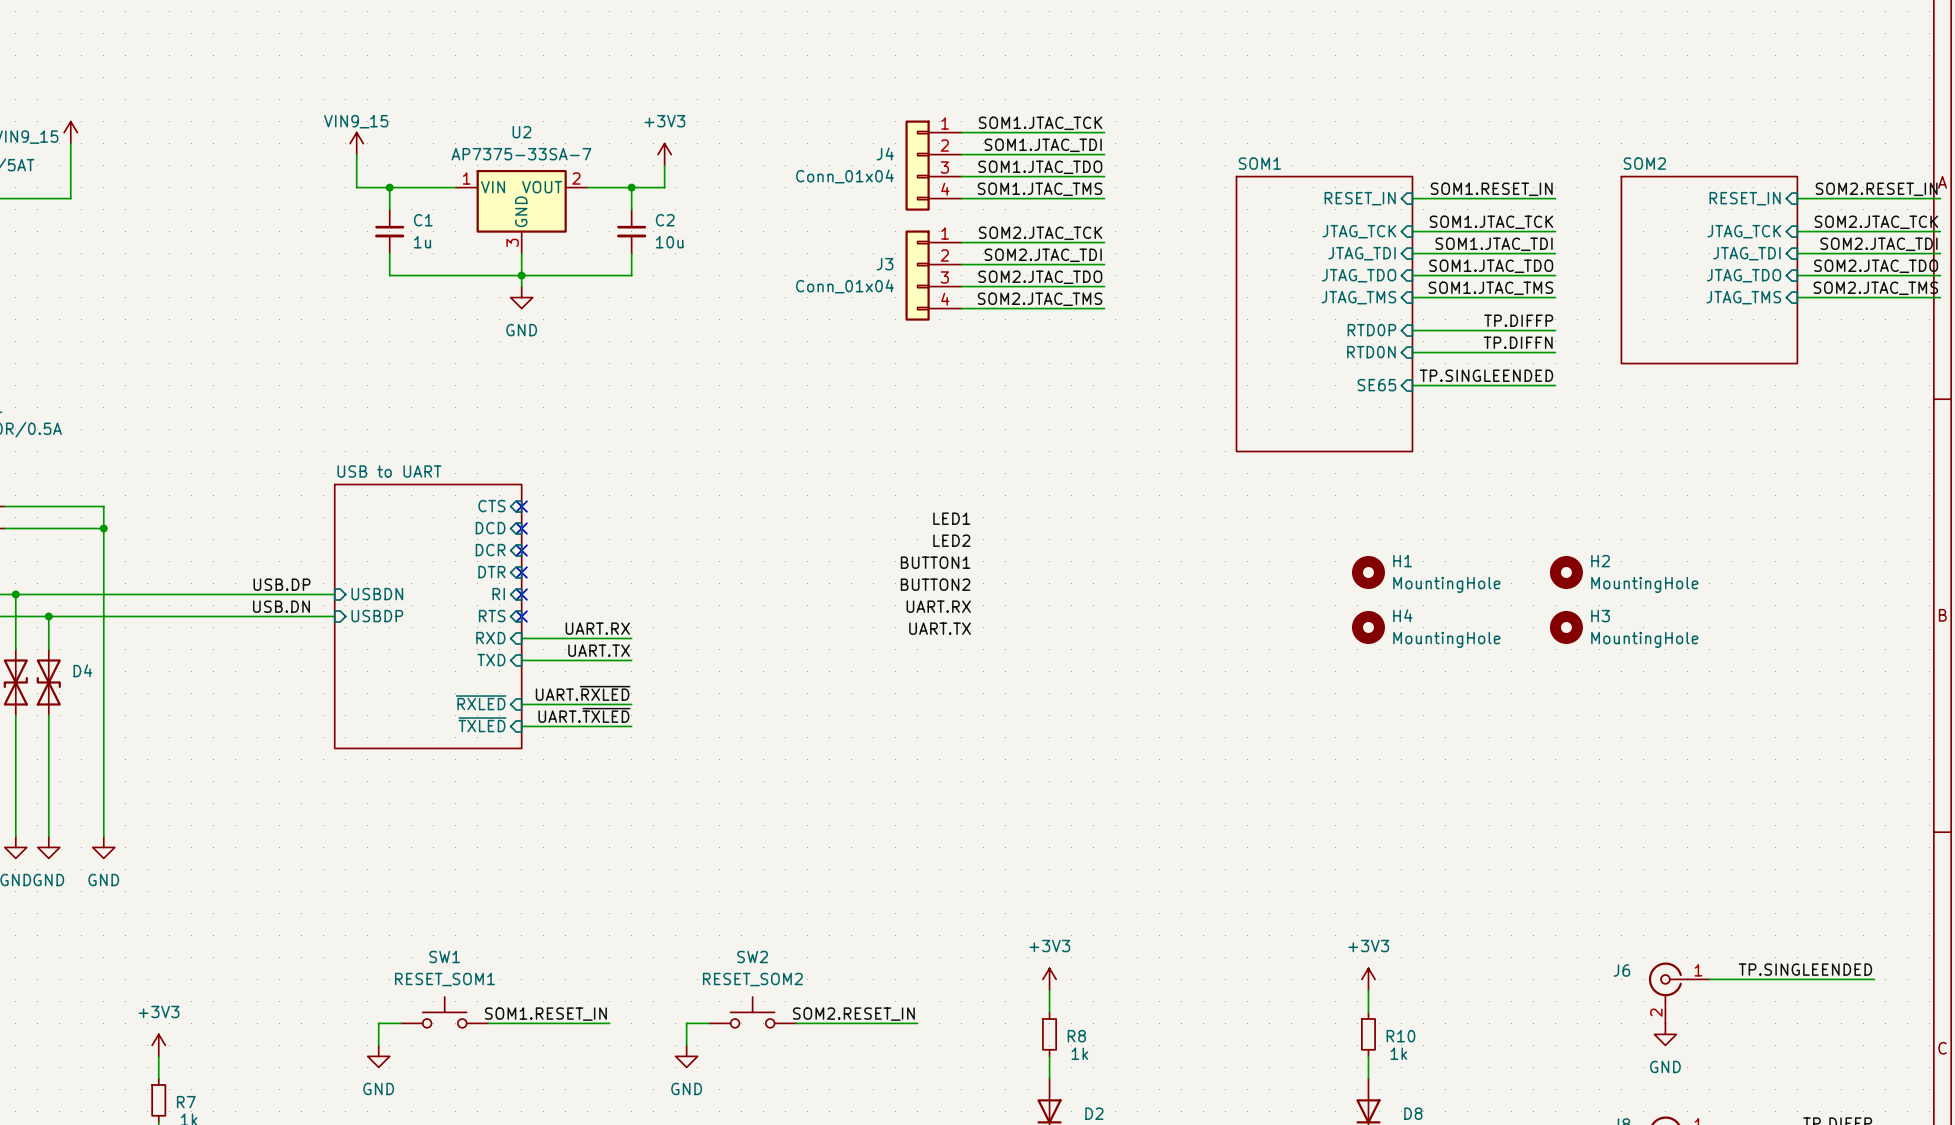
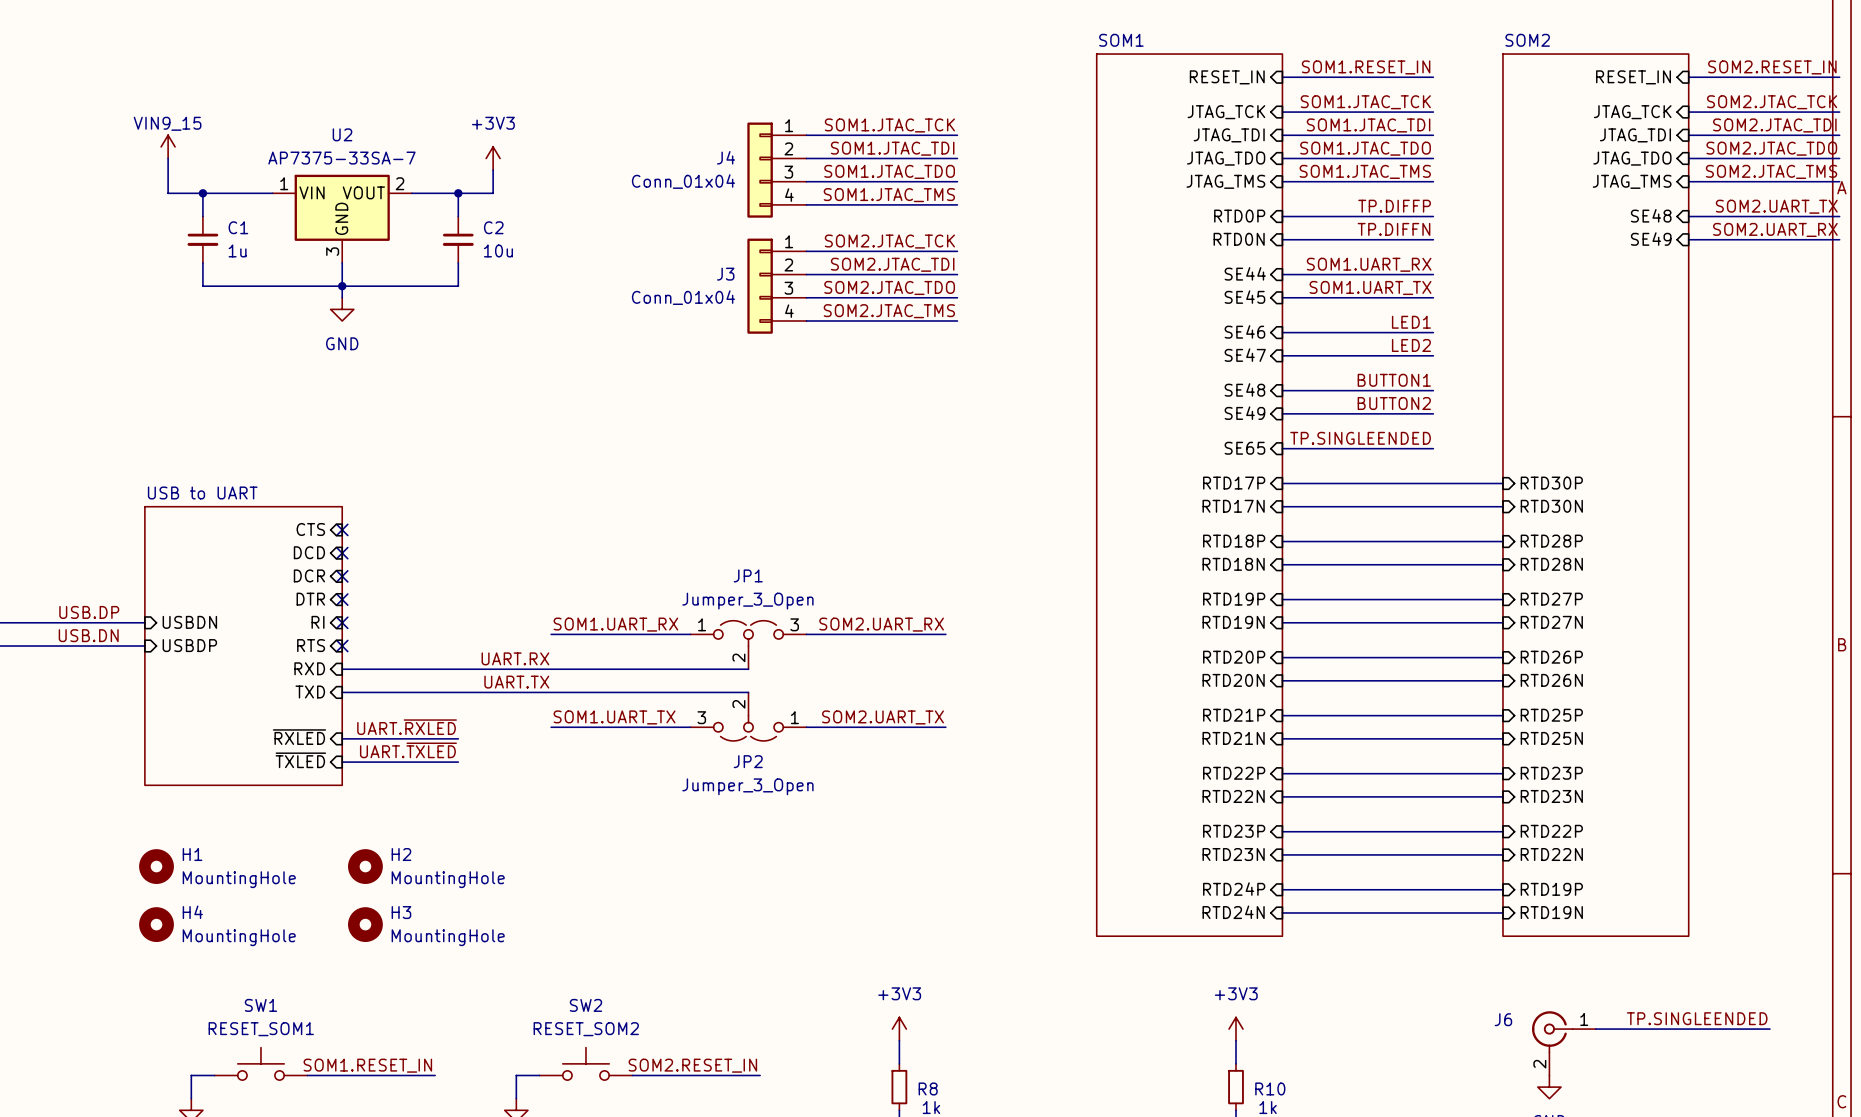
label: none -> SOM1.JTAC_TCK (1365, 102)
label: none -> SOM2.JTAC_TCK (1772, 102)
sheet pin: none -> JTAG_TCK (1226, 112)
wire: none -> (1282, 112) (1433, 112)
sheet pin: none -> JTAG_TCK (1632, 112)
wire: none -> (1688, 112) (1839, 112)
sheet SOM1 name position: SOM1 (1259, 163) -> SOM1 (1121, 40)
sheet SOM2 name position: SOM2 (1644, 163) -> SOM2 (1527, 40)
sheet SOM1 shape: [1235, 175, 1414, 453] -> [1096, 53, 1284, 937]
sheet SOM2 shape: [1620, 175, 1799, 365] -> [1502, 53, 1690, 937]
label position: SOM1.RESET_IN (1491, 189) -> SOM1.RESET_IN (1366, 67)
label position: SOM2.RESET_IN (1876, 189) -> SOM2.RESET_IN (1772, 67)
sheet pin position: RESET_IN (1360, 198) -> RESET_IN (1227, 77)
wire: (1412, 198) (1555, 198) -> (1282, 77) (1433, 77)
sheet pin position: RESET_IN (1745, 198) -> RESET_IN (1633, 77)
wire: (1797, 198) (1940, 198) -> (1688, 77) (1839, 77)
label: none -> SOM2.UART_TX (1776, 206)
sheet pin: none -> SE48 (1651, 215)
wire: none -> (1688, 216) (1839, 216)
label: SOM1.JTAC_TCK (1491, 222) -> TP.DIFFN (1394, 229)
label: SOM2.JTAC_TCK (1876, 222) -> SOM2.UART_RX (1775, 229)
sheet pin: JTAG_TCK (1359, 231) -> RTD0N (1239, 239)
sheet pin: JTAG_TCK (1744, 231) -> SE49 (1651, 239)
label position: SOM1.JTAC_TDI (1494, 244) -> SOM1.JTAC_TDI (1368, 125)
label position: SOM2.JTAC_TDI (1878, 244) -> SOM2.JTAC_TDI (1774, 125)
sheet pin position: JTAG_TDI (1362, 253) -> JTAG_TDI (1229, 135)
wire: (1412, 253) (1555, 253) -> (1282, 135) (1433, 135)
sheet pin position: JTAG_TDI (1746, 253) -> JTAG_TDI (1635, 135)
wire: (1797, 253) (1940, 253) -> (1688, 135) (1839, 135)
label: none -> SOM1.UART_RX (1369, 264)
sheet pin: none -> SE44 (1245, 273)
label position: SOM1.JTAC_TDO (1491, 266) -> SOM1.JTAC_TDO (1365, 148)
label position: SOM2.JTAC_TDO (1876, 266) -> SOM2.JTAC_TDO (1771, 148)
sheet pin position: JTAG_TDO (1359, 275) -> JTAG_TDO (1226, 158)
wire: (1412, 275) (1555, 275) -> (1282, 158) (1433, 158)
sheet pin position: JTAG_TDO (1744, 275) -> JTAG_TDO (1632, 158)
wire: (1797, 275) (1940, 275) -> (1688, 158) (1839, 158)
label: none -> SOM1.UART_TX (1370, 287)
sheet pin: none -> SE45 (1244, 297)
label position: SOM1.JTAC_TMS (1490, 288) -> SOM1.JTAC_TMS (1365, 171)
label position: SOM2.JTAC_TMS (1875, 288) -> SOM2.JTAC_TMS (1771, 171)
sheet pin position: JTAG_TMS (1358, 297) -> JTAG_TMS (1225, 181)
wire: (1412, 297) (1555, 297) -> (1282, 181) (1433, 181)
sheet pin position: JTAG_TMS (1743, 297) -> JTAG_TMS (1632, 181)
wire: (1797, 297) (1940, 297) -> (1688, 181) (1839, 181)
label: none -> LED1 (1411, 322)
sheet pin: none -> SE46 (1244, 331)
wire: none -> (1282, 332) (1433, 332)
label position: TP.DIFFP (1518, 320) -> TP.DIFFP (1394, 206)
sheet pin position: RTD0P (1371, 330) -> RTD0P (1239, 216)
wire: (1412, 330) (1555, 330) -> (1282, 216) (1433, 216)
label: none -> LED2 (1411, 345)
sheet pin: none -> SE47 (1245, 355)
wire: none -> (1282, 355) (1433, 355)
label: TP.DIFFN (1518, 342) -> none
sheet pin: RTD0N (1371, 352) -> none
wire: (1412, 352) (1555, 352) -> (1282, 297) (1433, 297)
label: none -> BUTTON1 (1394, 380)
sheet pin: none -> SE48 (1244, 389)
wire: none -> (1282, 390) (1433, 390)
label position: TP.SINGLEENDED (1486, 375) -> TP.SINGLEENDED (1360, 438)
sheet pin position: SE65 (1376, 385) -> SE65 (1244, 448)
wire: (1412, 385) (1555, 385) -> (1282, 274) (1433, 274)
label: none -> BUTTON2 (1394, 403)
sheet pin: none -> SE49 (1244, 413)
wire: none -> (1282, 413) (1433, 413)
wire: none -> (1282, 448) (1433, 448)
sheet pin: none -> RTD17P (1234, 483)
wire: none -> (1282, 483) (1502, 483)
sheet pin: none -> RTD30P (1551, 483)
sheet pin: none -> RTD17N (1233, 506)
wire: none -> (1282, 506) (1502, 506)
sheet pin: none -> RTD30N (1551, 506)
sheet pin: none -> RTD18P (1234, 541)
wire: none -> (1282, 541) (1502, 541)
sheet pin: none -> RTD28P (1551, 541)
label: LED1 (951, 518) -> none
sheet pin: none -> RTD18N (1233, 564)
wire: none -> (1282, 564) (1502, 564)
sheet pin: none -> RTD28N (1551, 564)
label: LED2 (951, 540) -> none
label: BUTTON1 (935, 562) -> none
sheet pin: none -> RTD19P (1234, 599)
H1 position: (1368, 572) -> (156, 866)
wire: none -> (1282, 599) (1502, 599)
H2 position: (1566, 572) -> (365, 866)
sheet pin: none -> RTD27P (1551, 599)
label: BUTTON2 (935, 584) -> none
sheet pin: none -> RTD19N (1233, 622)
wire: none -> (1282, 622) (1502, 622)
sheet pin: none -> RTD27N (1551, 622)
label: none -> SOM1.UART_RX (615, 624)
wire: none -> (551, 634) (690, 634)
wire: none -> (806, 634) (945, 634)
label: UART.RX (938, 606) -> SOM2.UART_RX (881, 624)
JP1: none -> Jumper_3_Open (748, 644)
sheet pin: none -> RTD20P (1234, 657)
H4 position: (1368, 627) -> (156, 924)
wire: none -> (1282, 657) (1502, 657)
H3 position: (1566, 627) -> (365, 924)
sheet pin: none -> RTD26P (1551, 657)
label position: UART.RX (597, 628) -> UART.RX (515, 658)
label: UART.TX (940, 628) -> none
wire: none -> (458, 669) (748, 669)
sheet pin: none -> RTD20N (1233, 680)
wire: none -> (1282, 680) (1502, 680)
sheet pin: none -> RTD26N (1551, 680)
label position: UART.TX (599, 650) -> UART.TX (516, 682)
wire: none -> (458, 692) (748, 692)
sheet pin: none -> RTD21P (1234, 715)
wire: none -> (1282, 715) (1502, 715)
sheet pin: none -> RTD25P (1551, 715)
JP2: none -> Jumper_3_Open (748, 716)
label: none -> SOM1.UART_TX (614, 717)
label: none -> SOM2.UART_TX (882, 717)
wire: none -> (551, 727) (690, 727)
wire: none -> (806, 727) (945, 727)
sheet pin: none -> RTD21N (1233, 738)
wire: none -> (1282, 738) (1502, 738)
sheet pin: none -> RTD25N (1551, 738)
sheet pin: none -> RTD22P (1234, 773)
wire: none -> (1282, 773) (1502, 773)
sheet pin: none -> RTD23P (1551, 773)
sheet pin: none -> RTD22N (1233, 796)
wire: none -> (1282, 796) (1502, 796)
sheet pin: none -> RTD23N (1551, 796)
sheet pin: none -> RTD23P (1234, 831)
wire: none -> (1282, 831) (1502, 831)
sheet pin: none -> RTD22P (1551, 831)
sheet pin: none -> RTD23N (1233, 854)
wire: none -> (1282, 854) (1502, 854)
sheet pin: none -> RTD22N (1551, 854)
sheet pin: none -> RTD24P (1234, 889)
wire: none -> (1282, 889) (1502, 889)
sheet pin: none -> RTD19P (1551, 889)
sheet pin: none -> RTD24N (1233, 912)
wire: none -> (1282, 912) (1502, 912)
sheet pin: none -> RTD19N (1551, 912)

